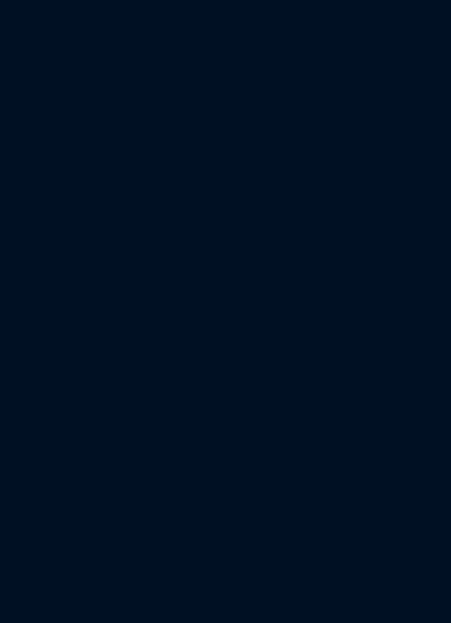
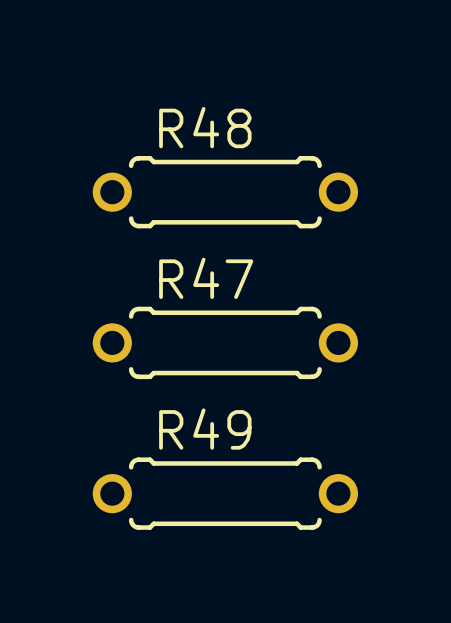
R48: none -> (225, 192)
R47: none -> (225, 342)
R49: none -> (225, 493)

